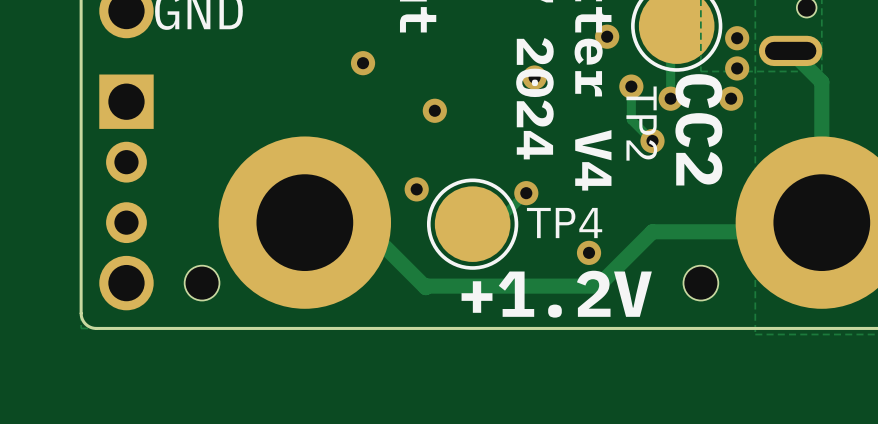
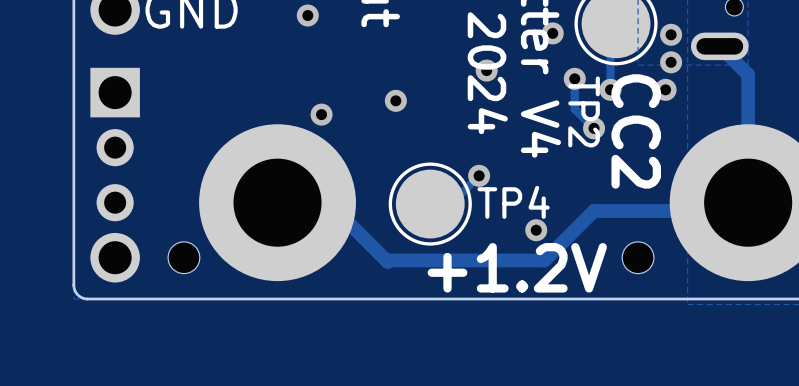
via: none -> (307, 15)
via: (363, 63) -> none
via: none -> (321, 114)
via: (416, 189) -> none

